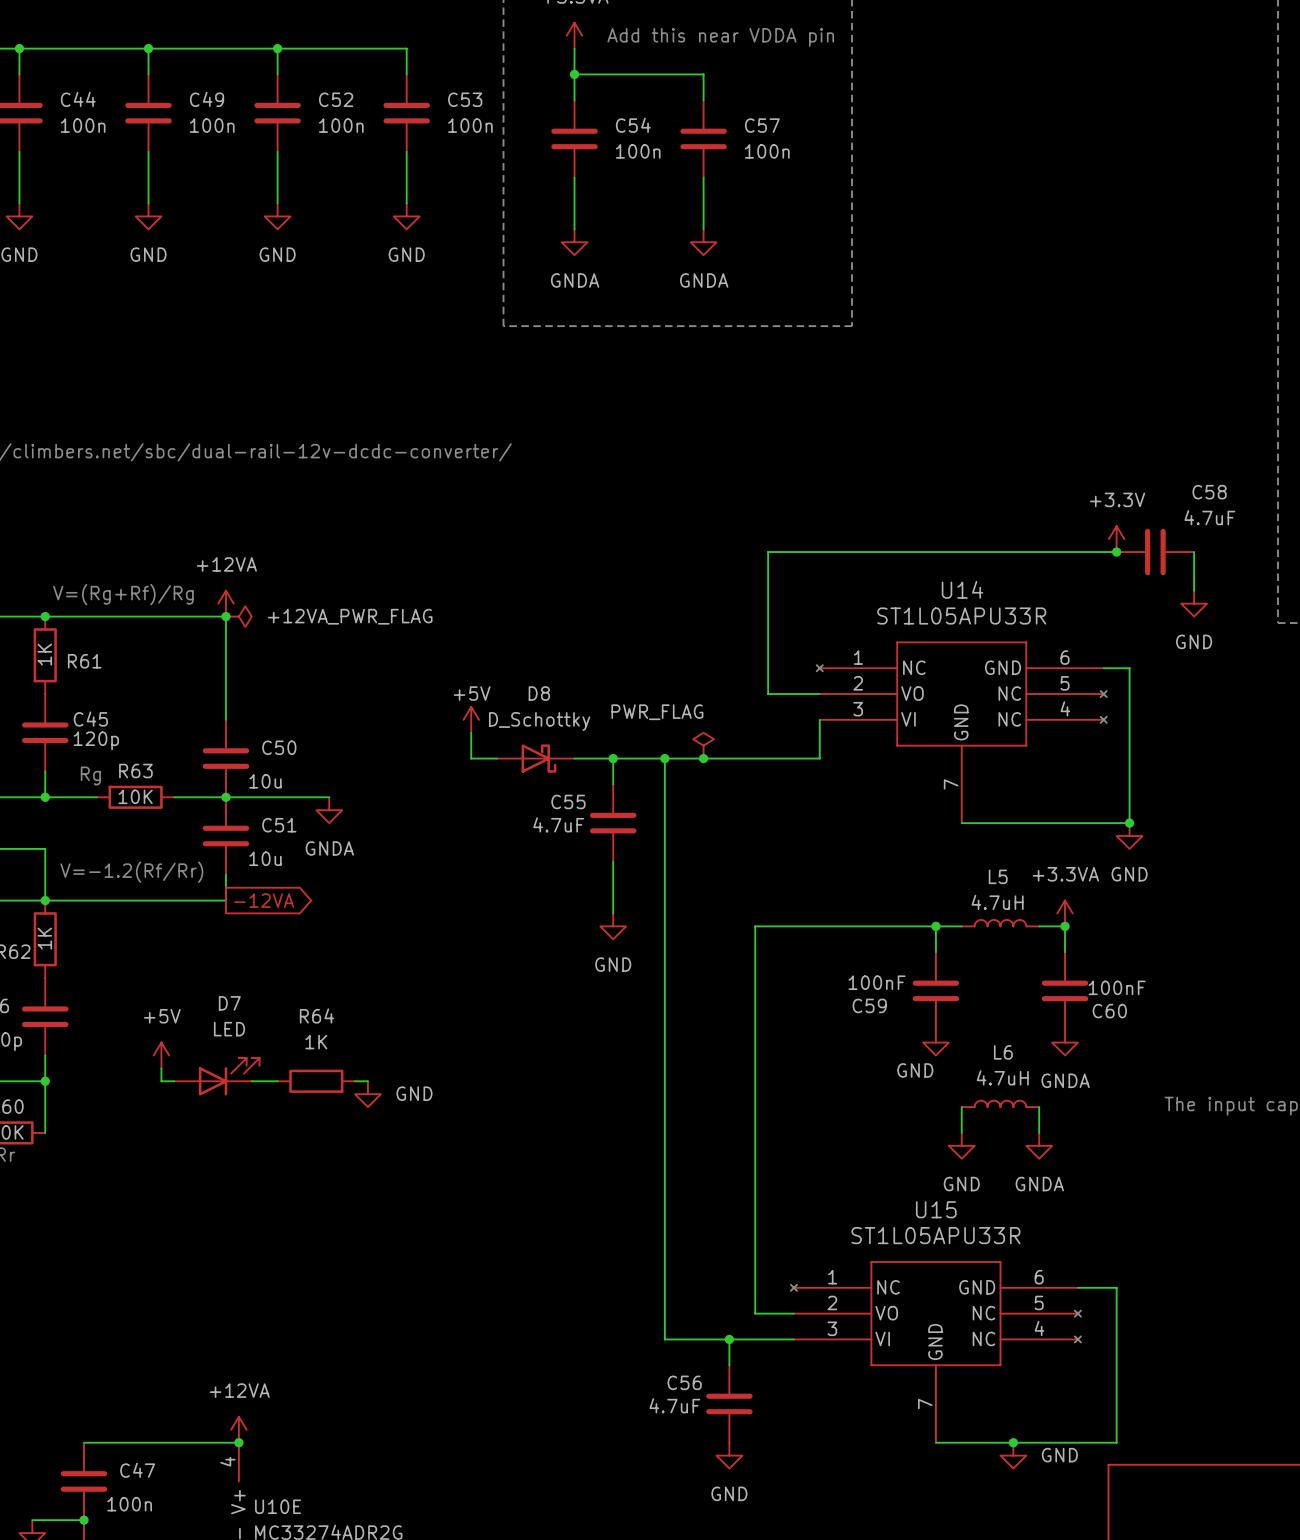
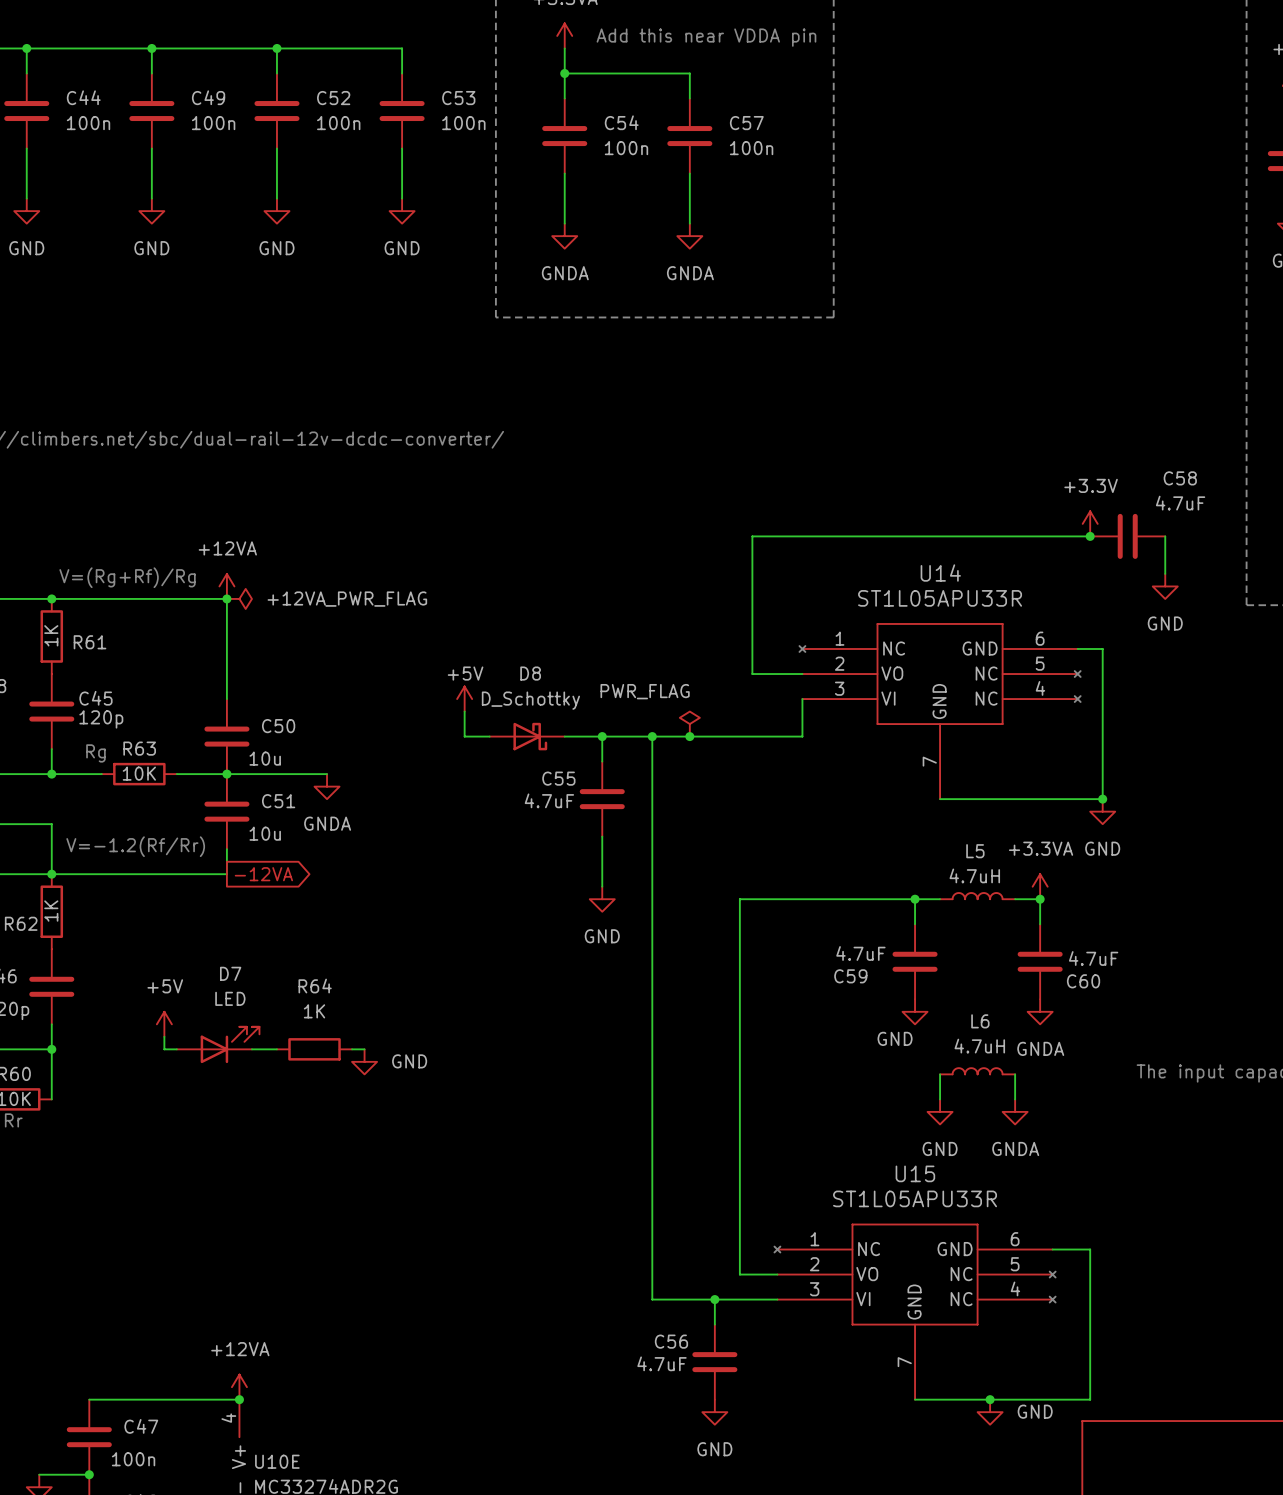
C59 value: 100nF (877, 982) -> 4.7uF (860, 953)
C60 value: 100nF (1117, 987) -> 4.7uF (1093, 958)

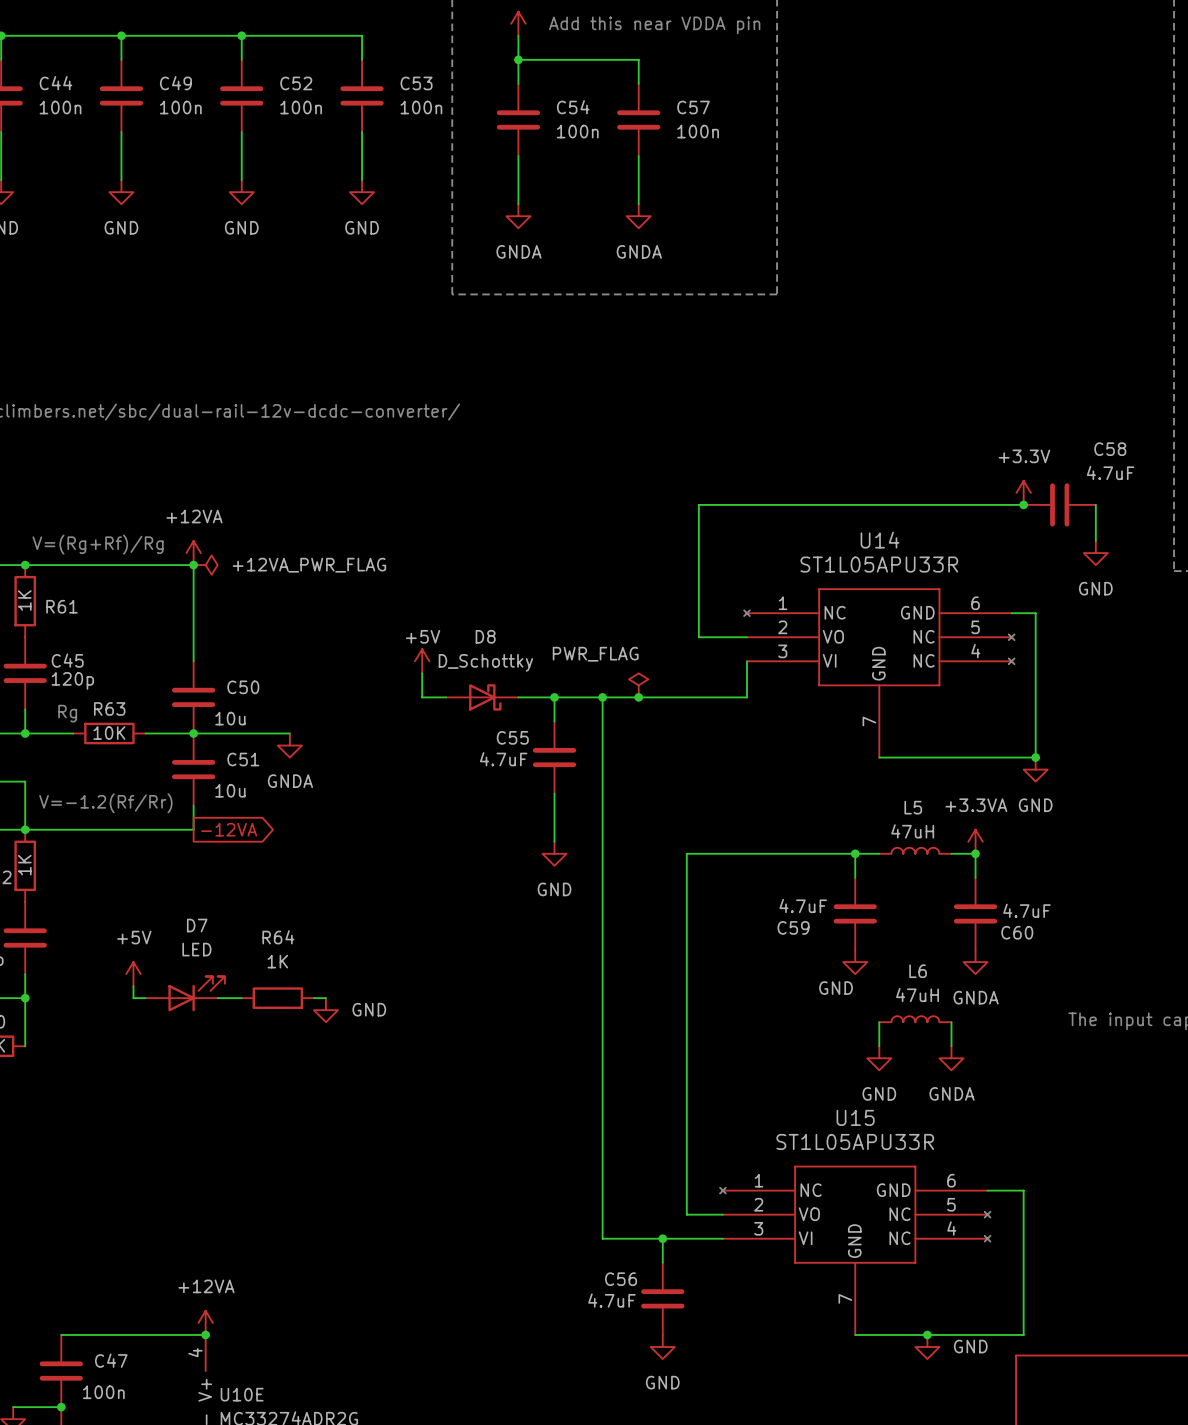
L5 value: 4.7uH (974, 875) -> 47uH (912, 831)
L6 value: 4.7uH (979, 1046) -> 47uH (917, 995)

